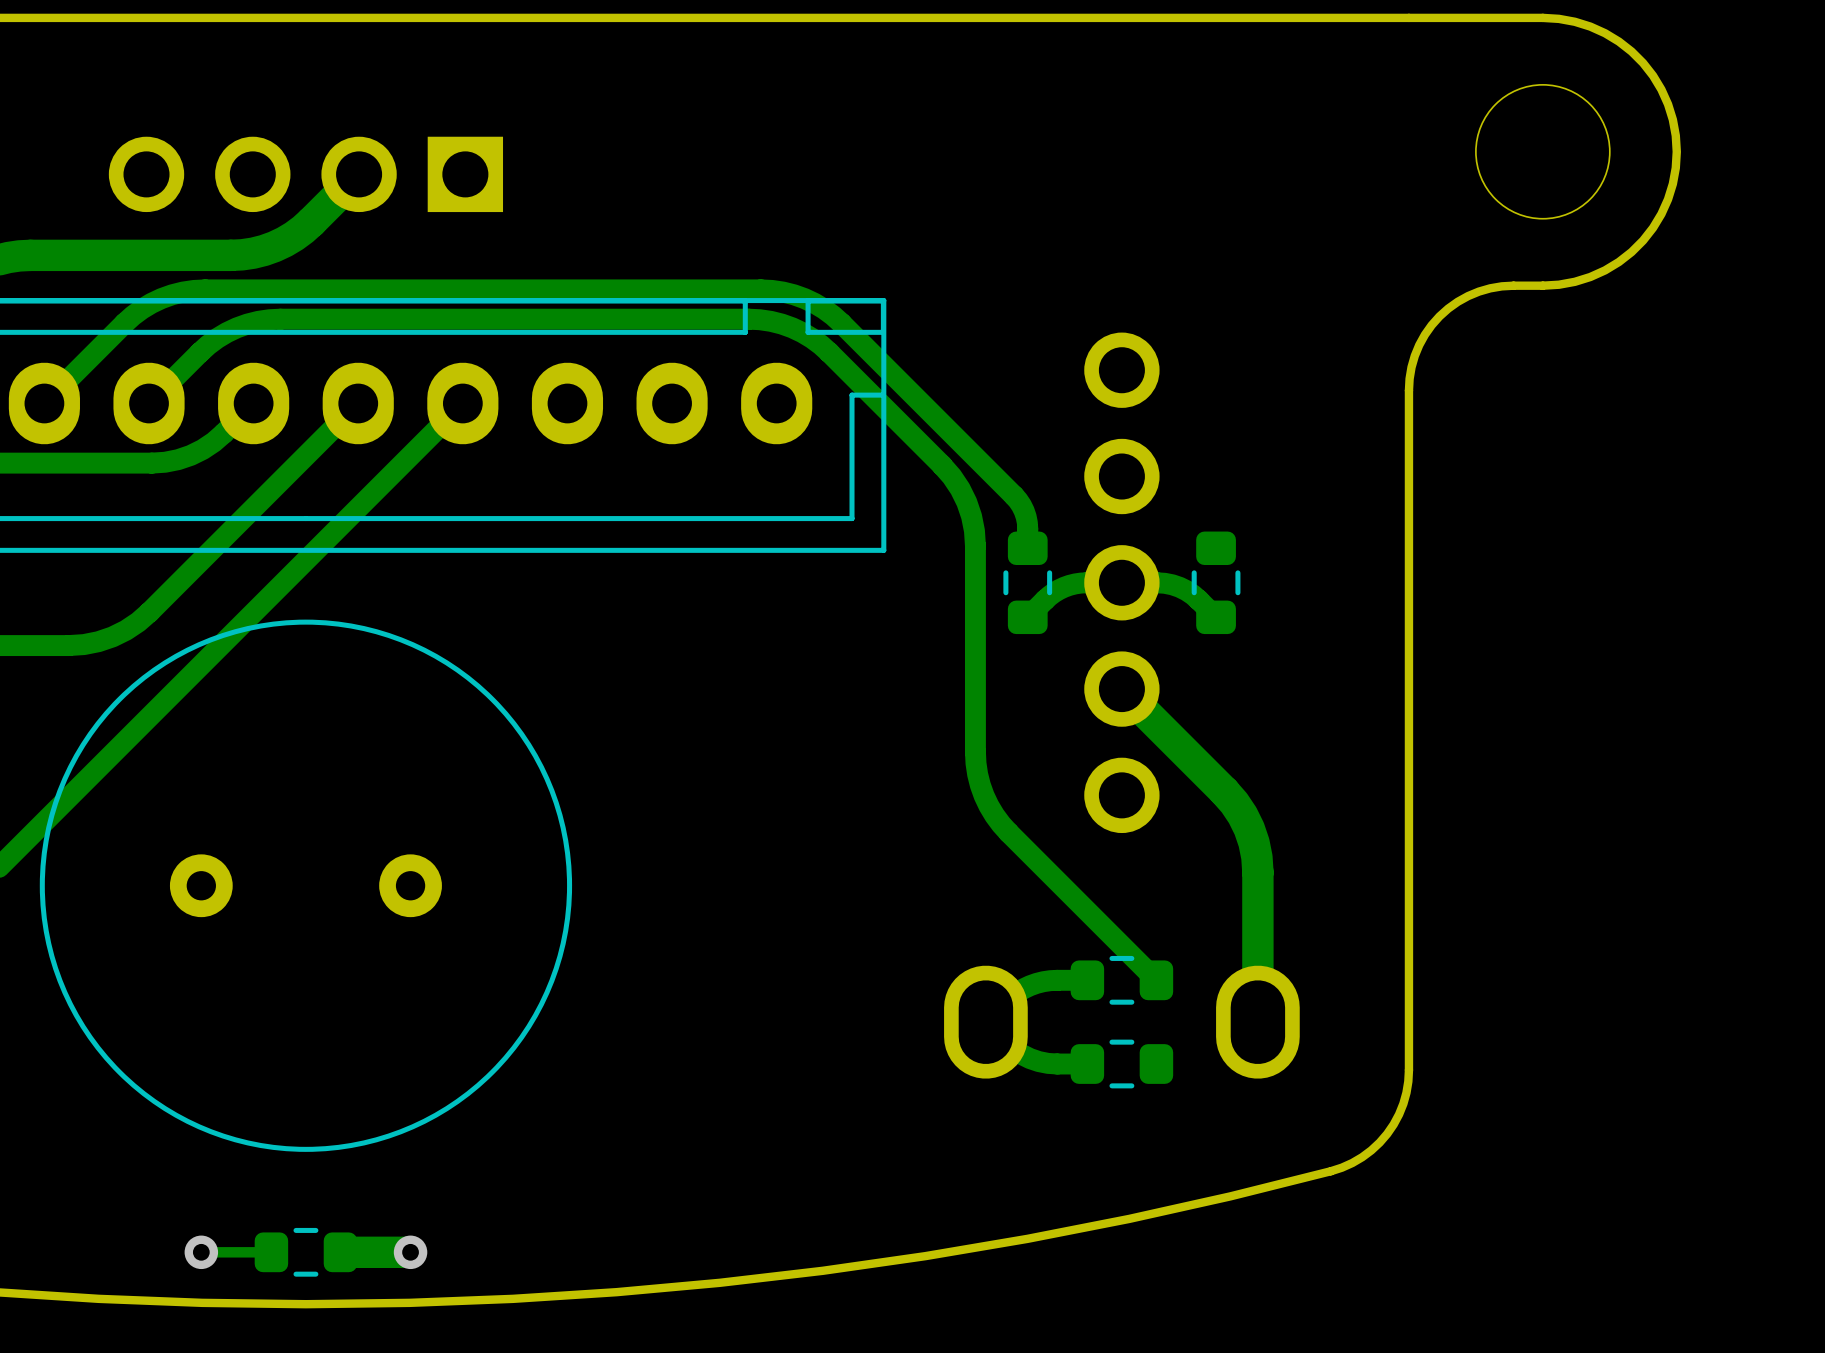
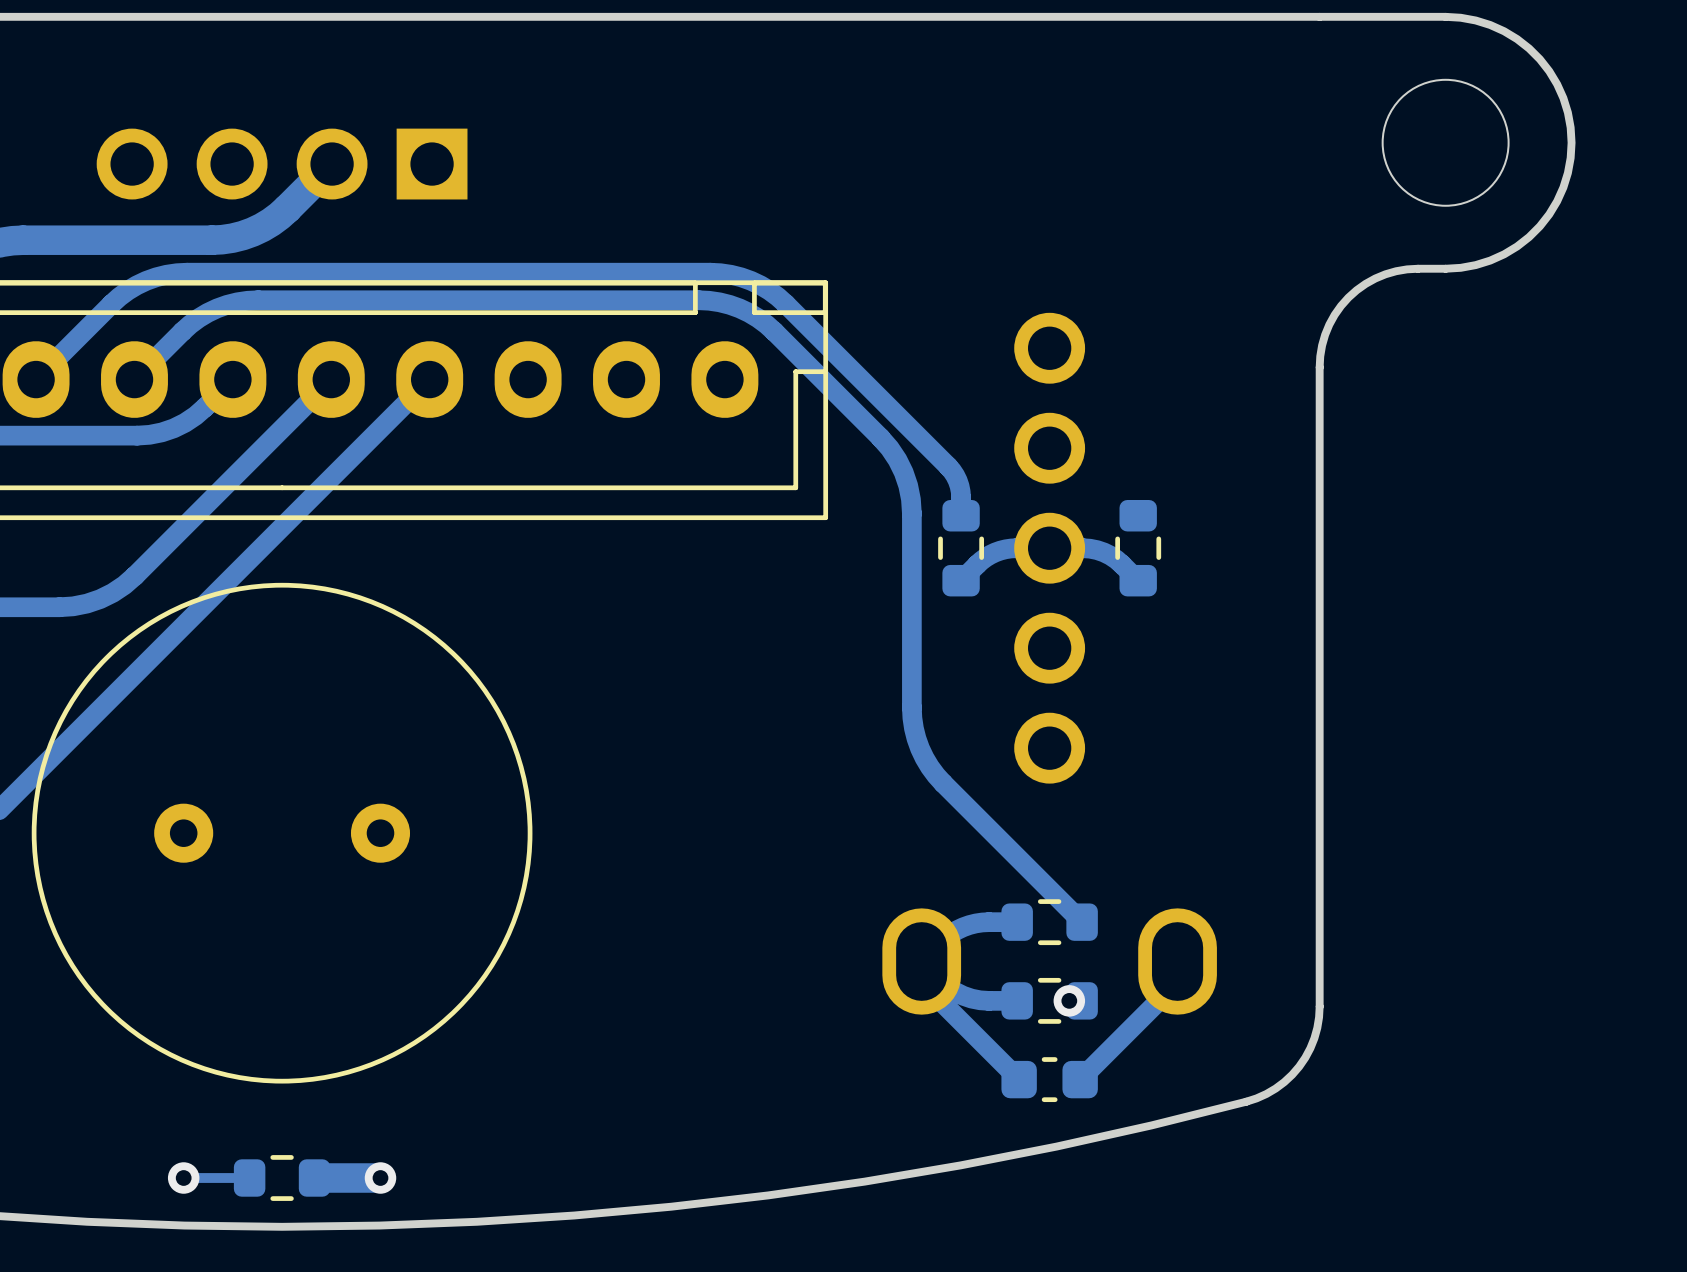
track: (1121, 689) (1224, 791) (1234, 802) (1249, 828) (1256, 857) (1257, 872) (1257, 1022) -> (1080, 1079) (1172, 987) (1176, 978) (1177, 961)
track: none -> (921, 961) (922, 976) (927, 987) (1019, 1079)
via: none -> (1069, 1000)
part: none -> (1049, 1079)

